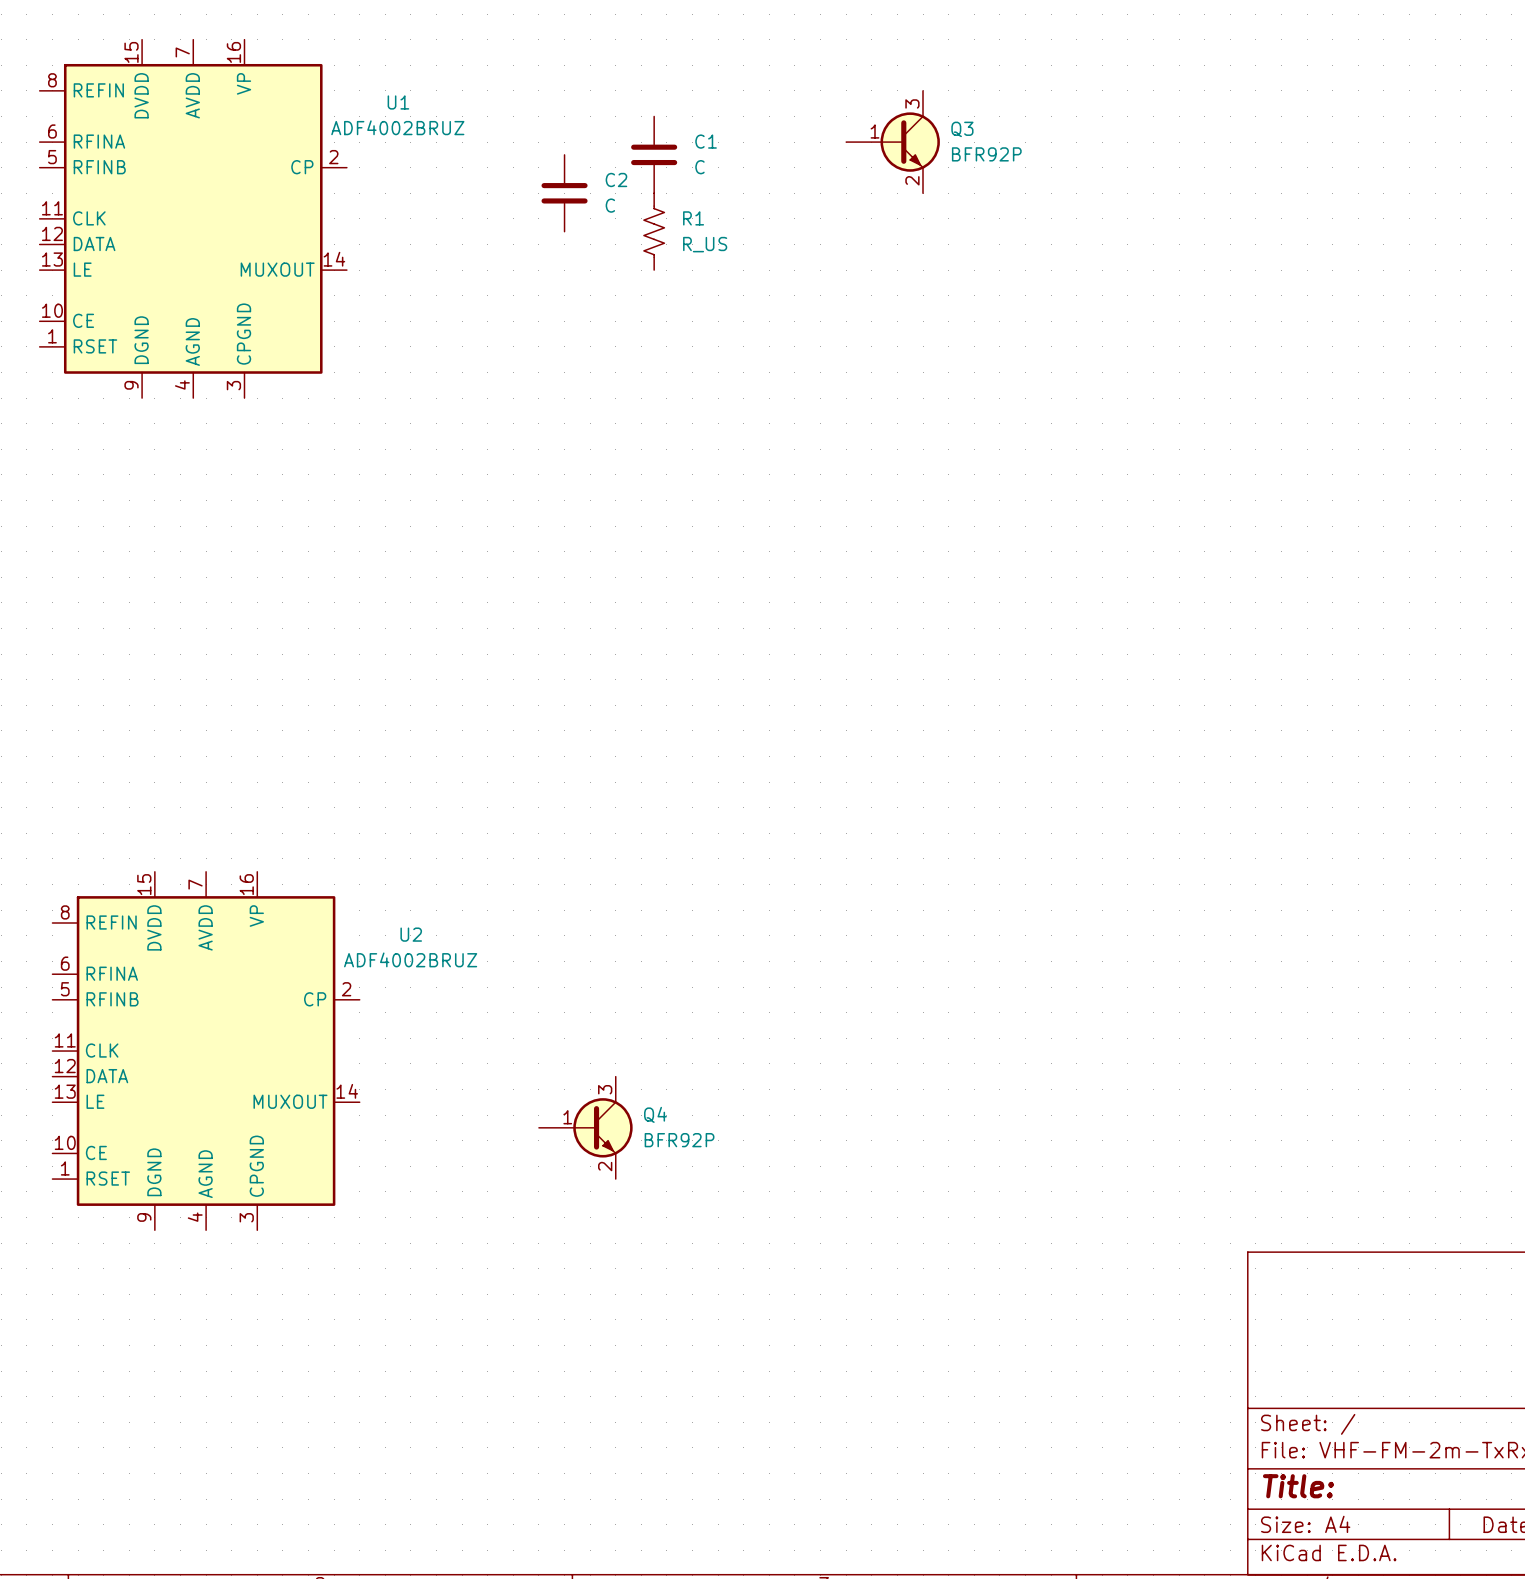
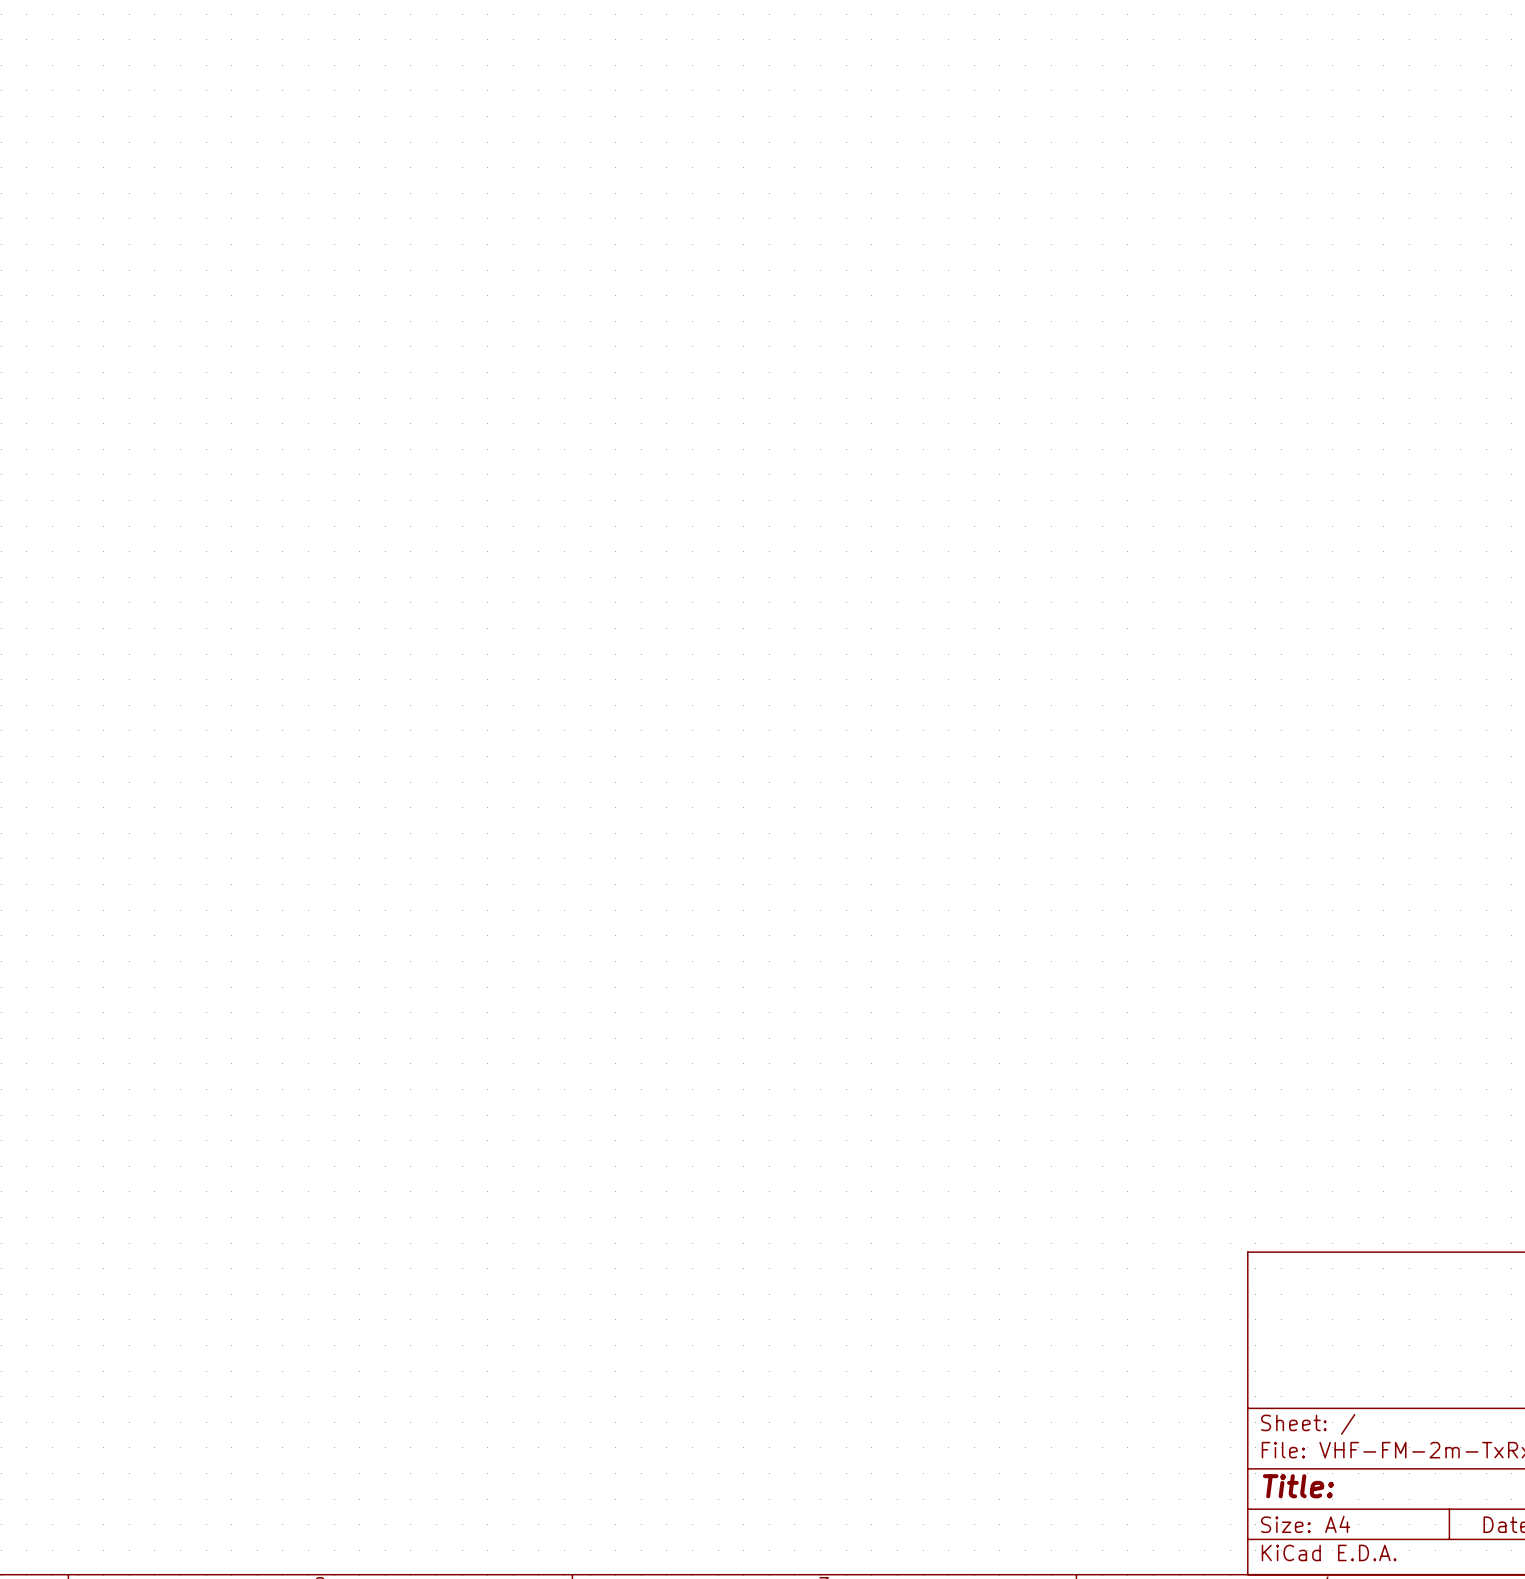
Q3: BFR92P (893, 142) -> none
C1: C (654, 154) -> none
C2: C (564, 193) -> none
U1: ADF4002BRUZ (193, 218) -> none
R1: R_US (654, 231) -> none
U2: ADF4002BRUZ (206, 1051) -> none
Q4: BFR92P (585, 1127) -> none

